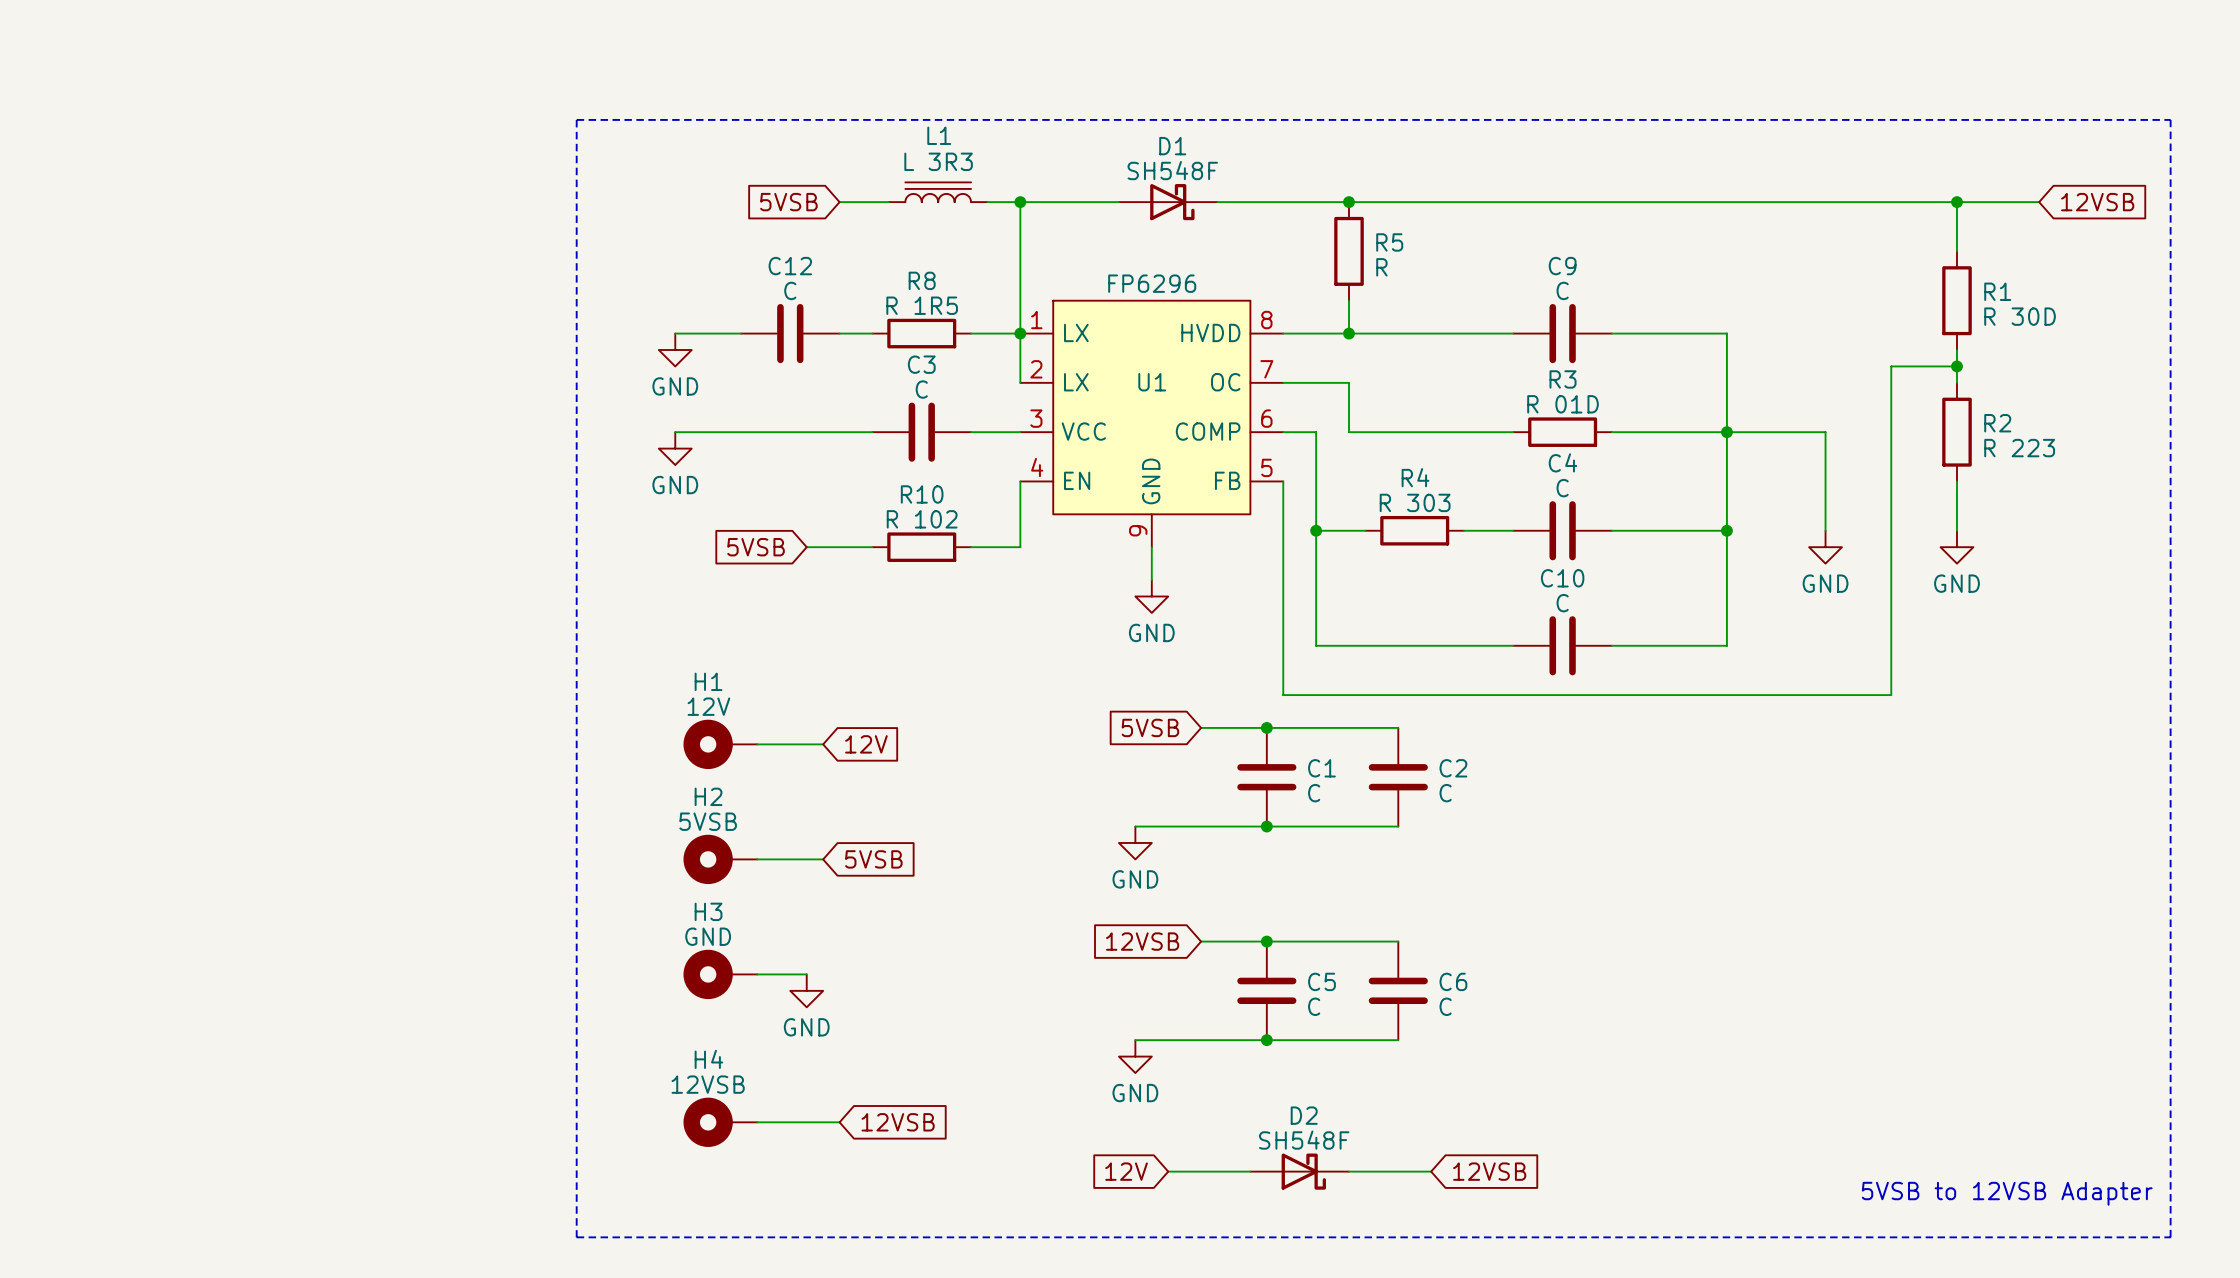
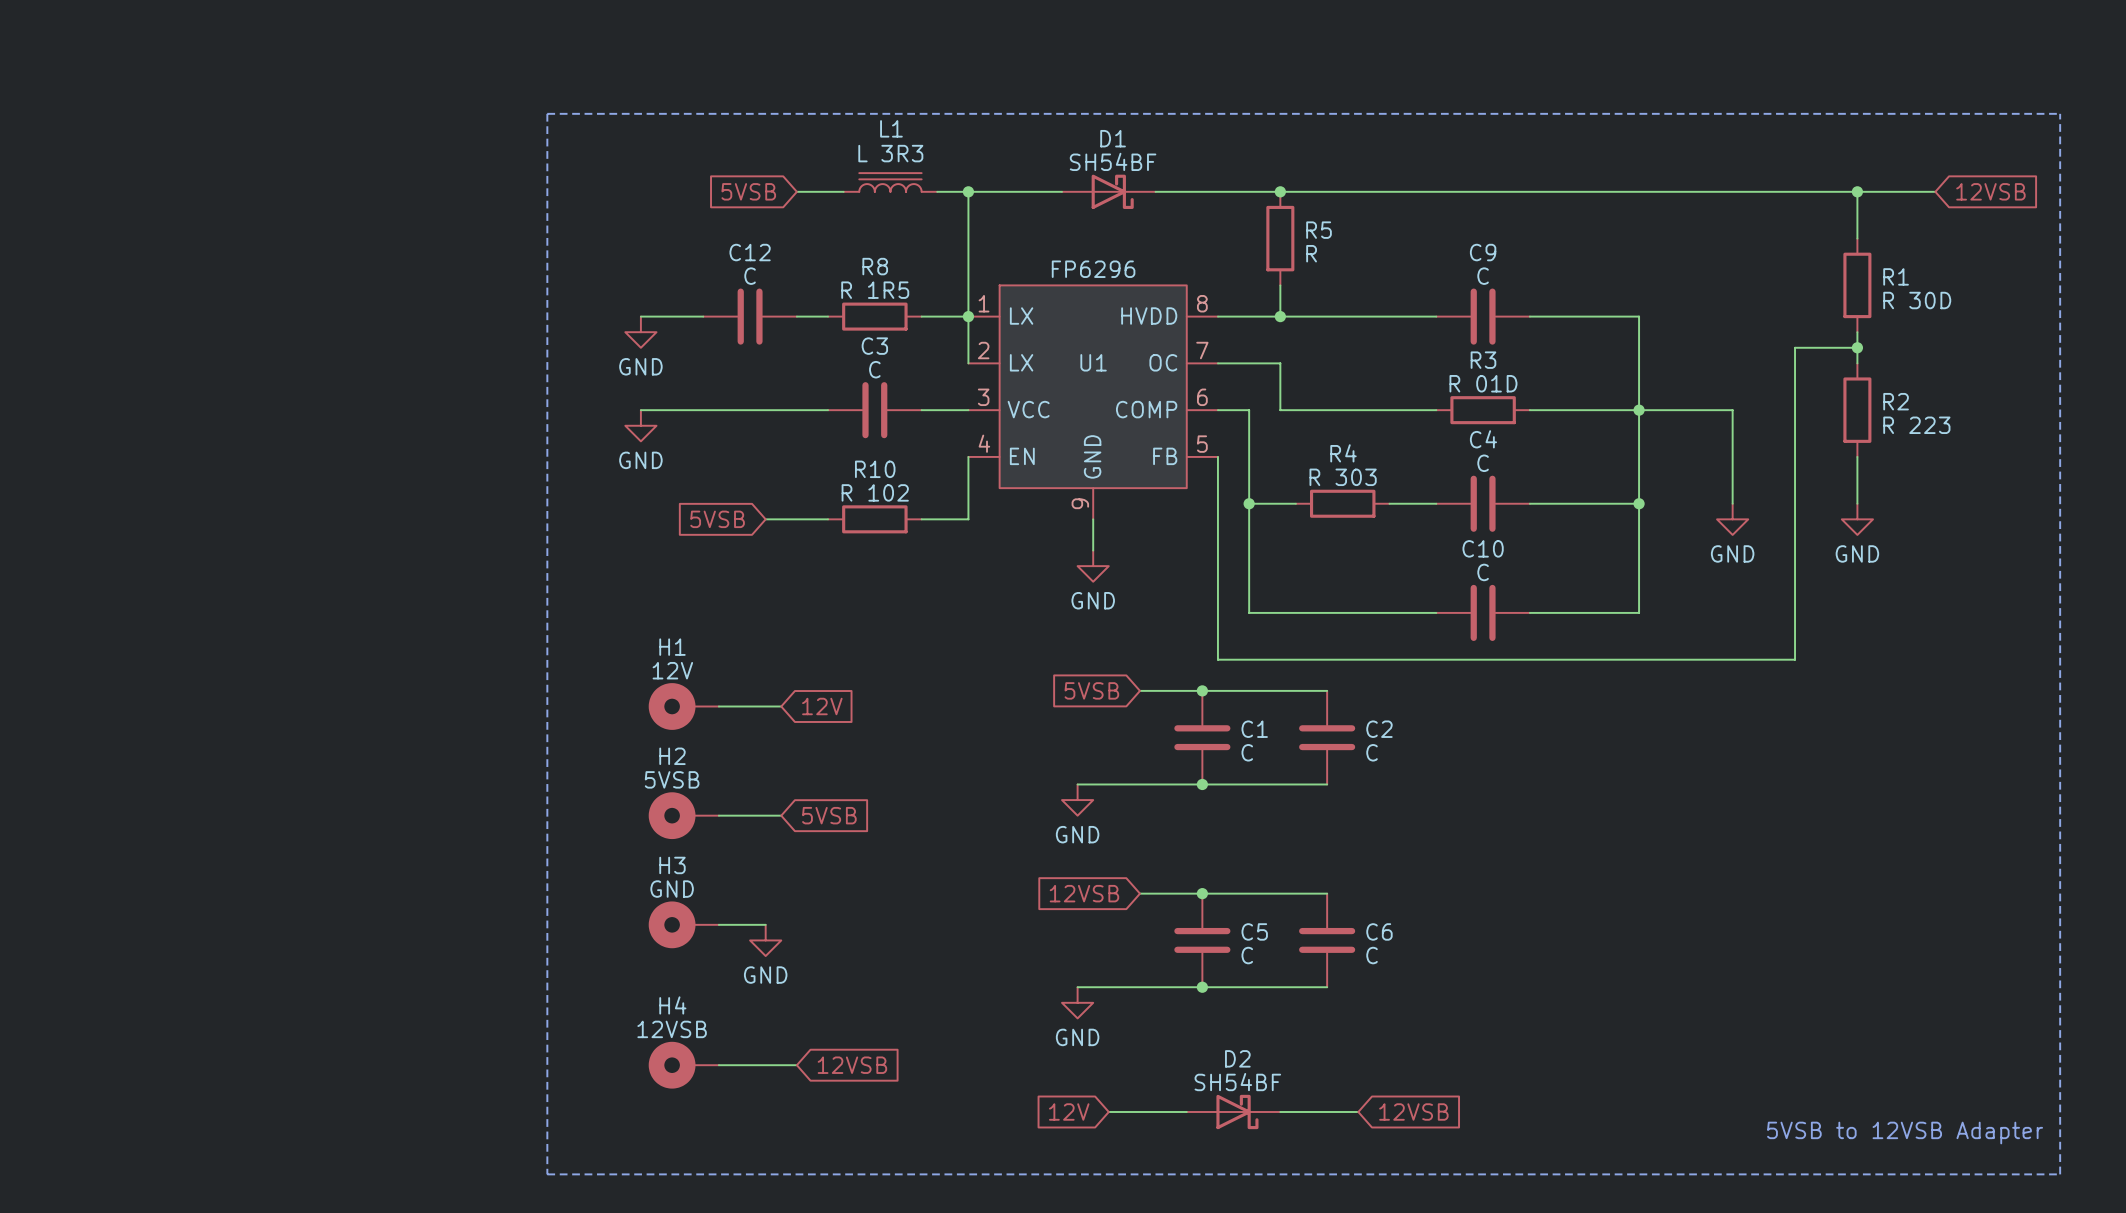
D1 value: SH548F (1172, 170) -> SH54BF (1113, 161)
D2 value: SH548F (1304, 1140) -> SH54BF (1237, 1082)

